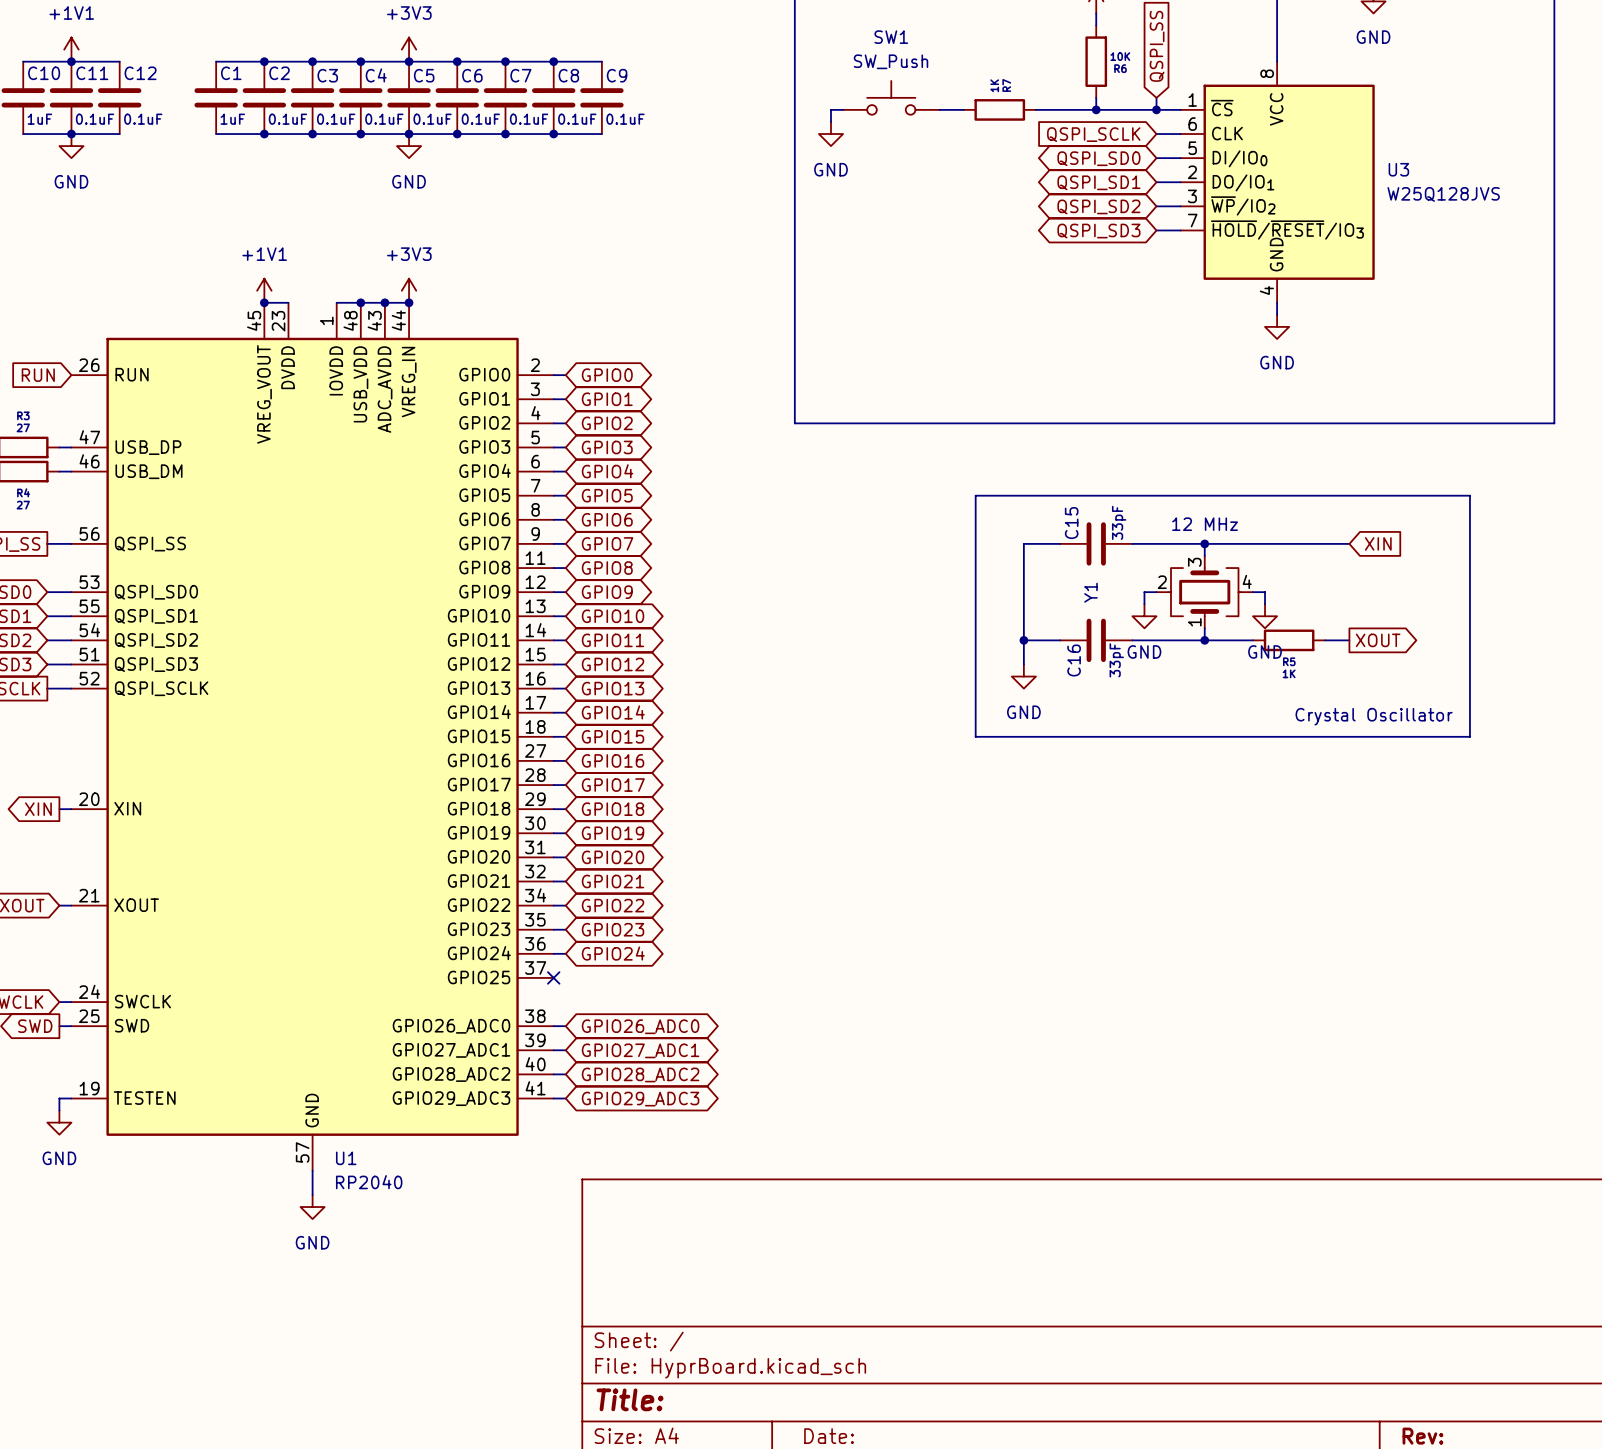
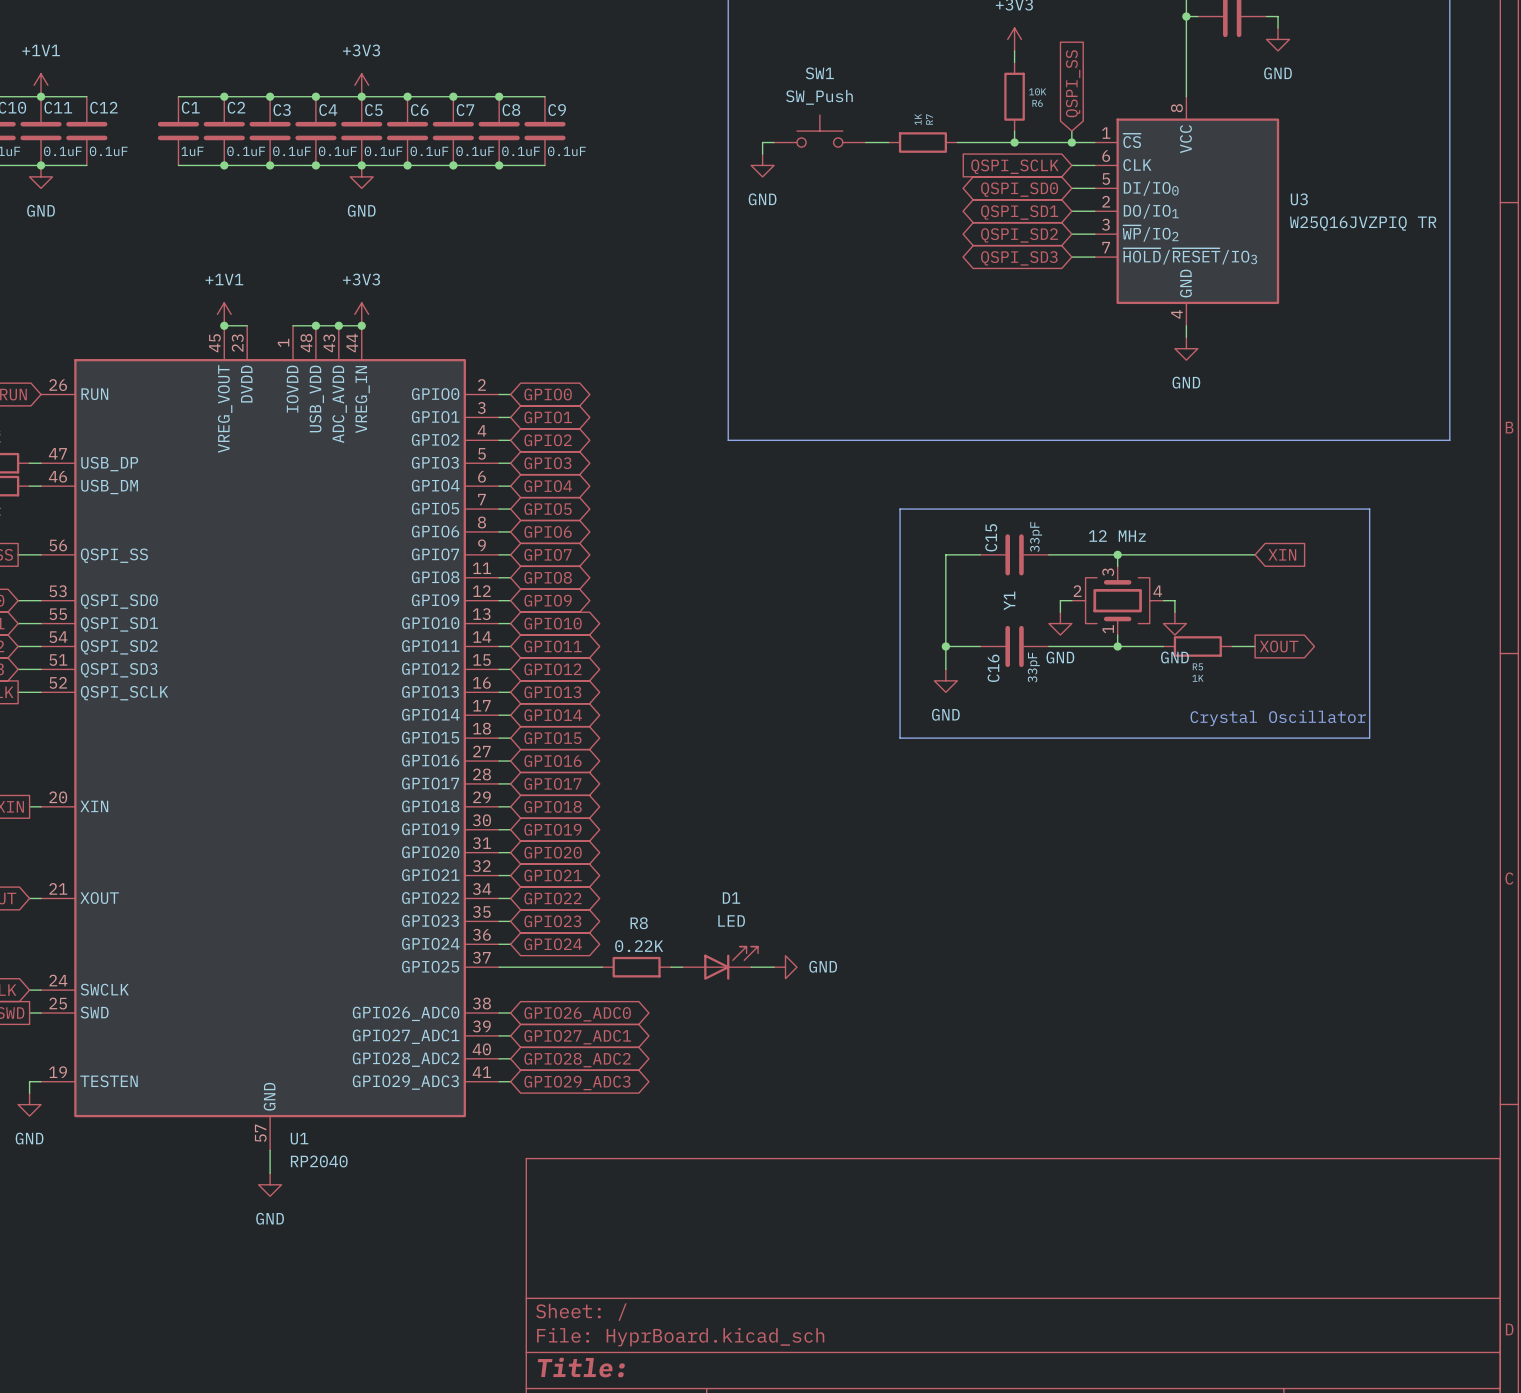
U3 value: W25Q128JVS (1443, 194) -> W25Q16JVZPIQ TR (1363, 223)
D1: none -> LED (720, 963)
wire: none -> (499, 967) (602, 967)
no-connect mark: (553, 977) -> none
R8: none -> 0.22K (636, 967)
wire: none -> (670, 967) (682, 967)
wire: none -> (751, 967) (774, 967)
power symbol: none -> GND (785, 967)

